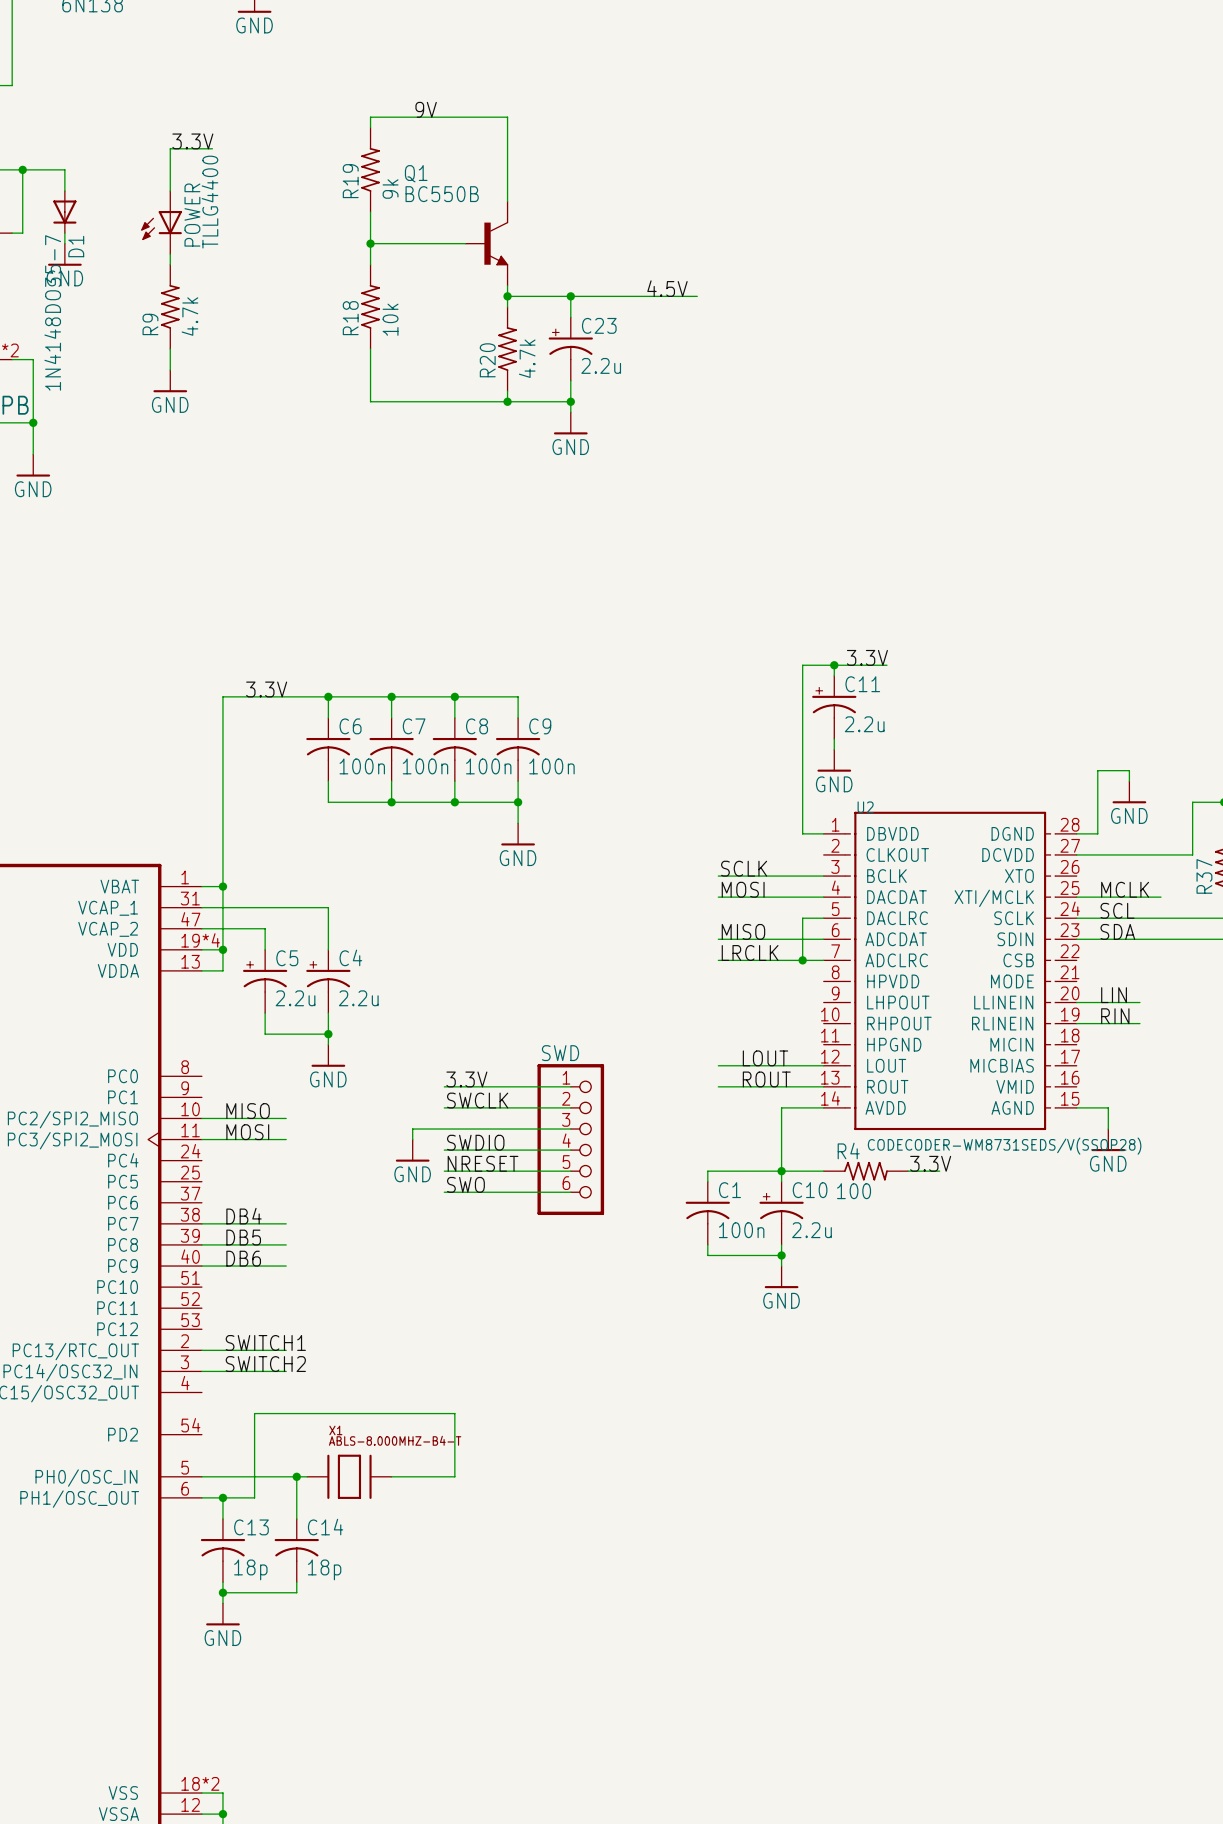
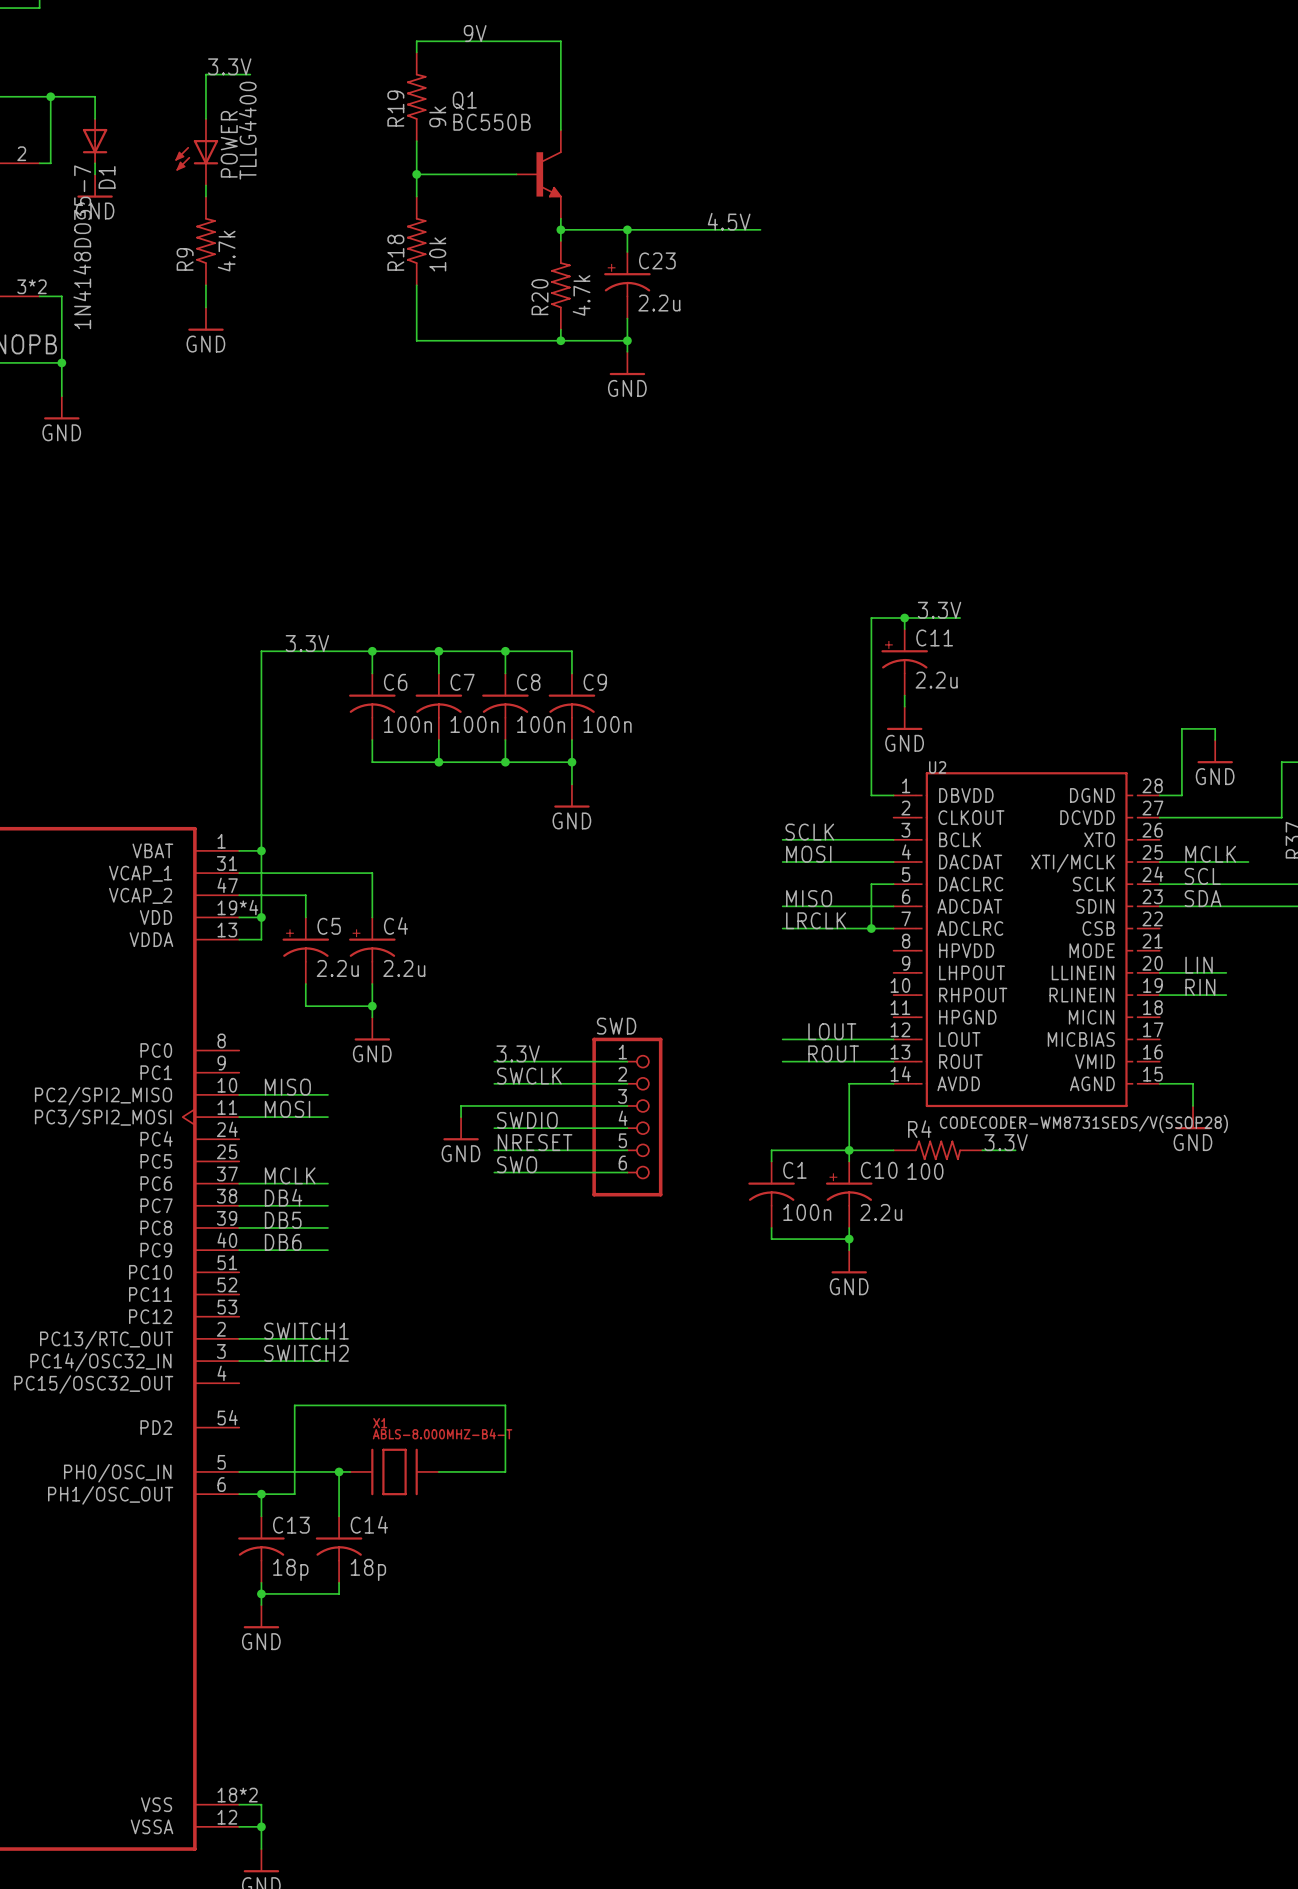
label: none -> MCLK (290, 1175)
wire: none -> (239, 1183) (327, 1183)

